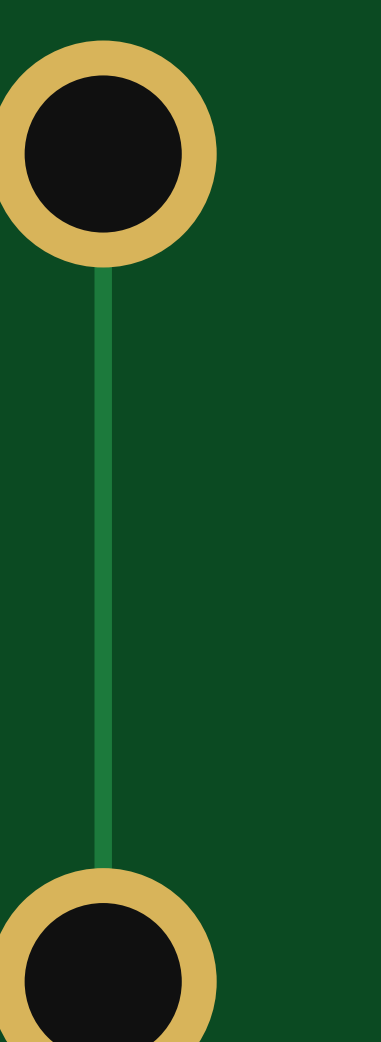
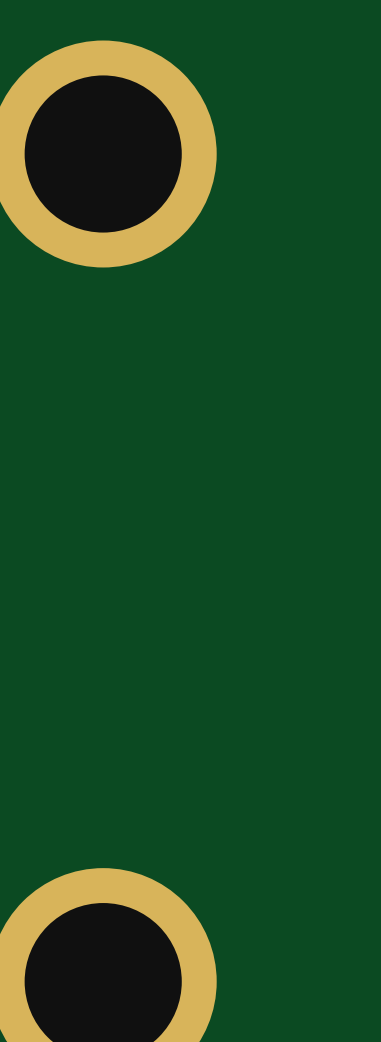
track: (103, 154) (103, 981) -> none

